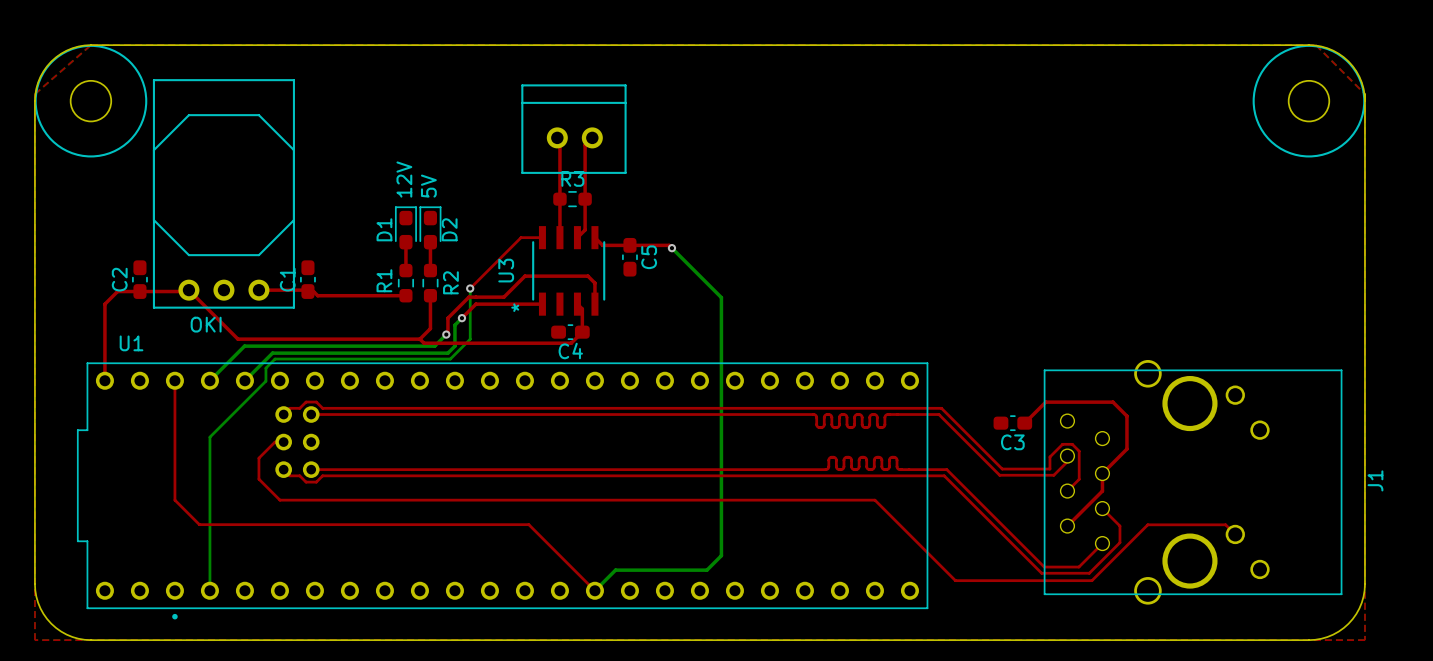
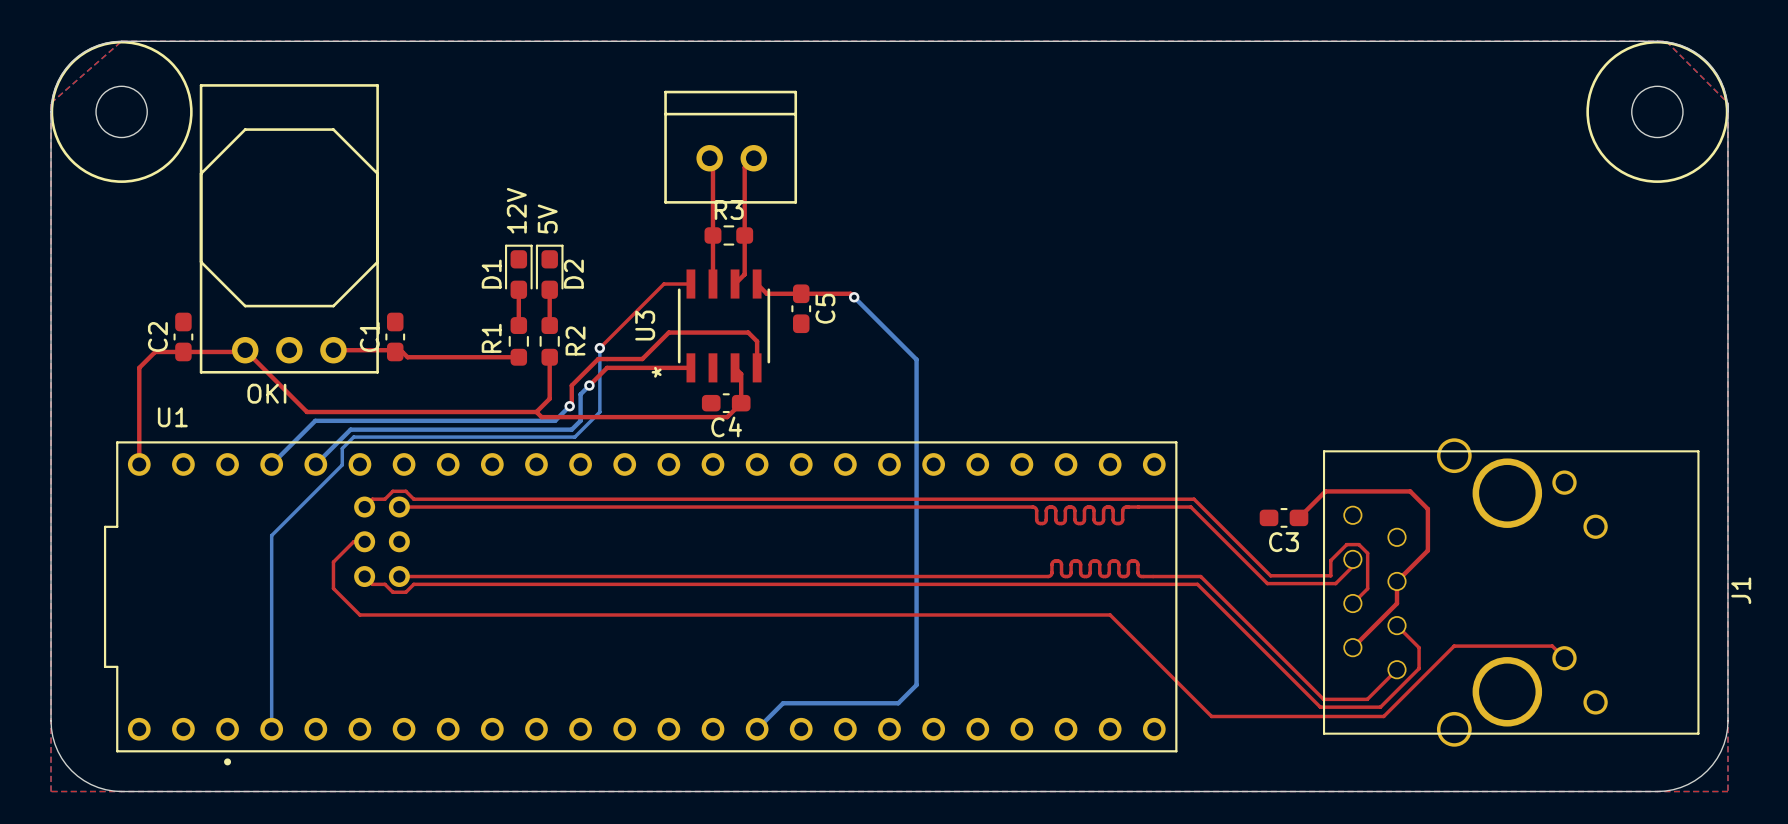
top track: (174, 380) (174, 500) (199, 524) (528, 524) (594, 590) -> none

